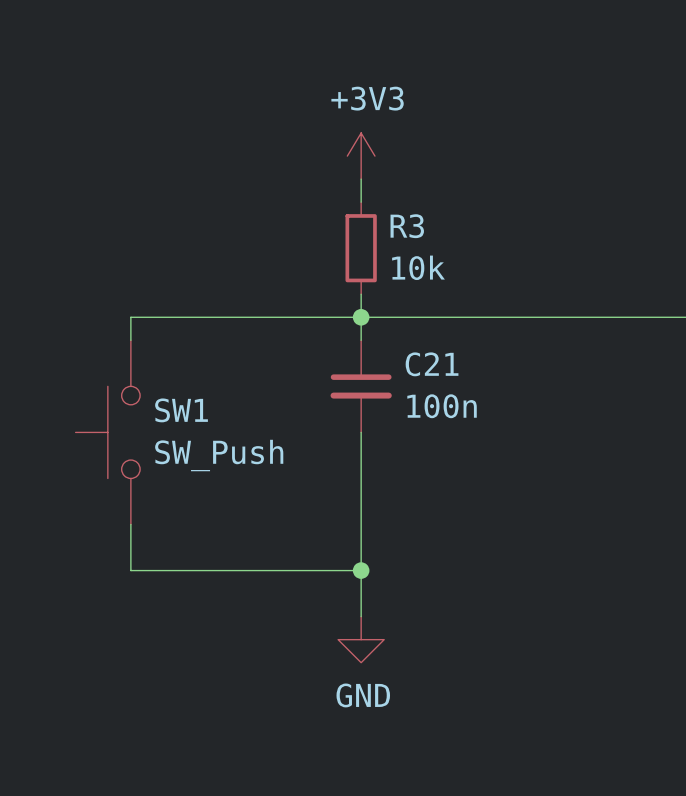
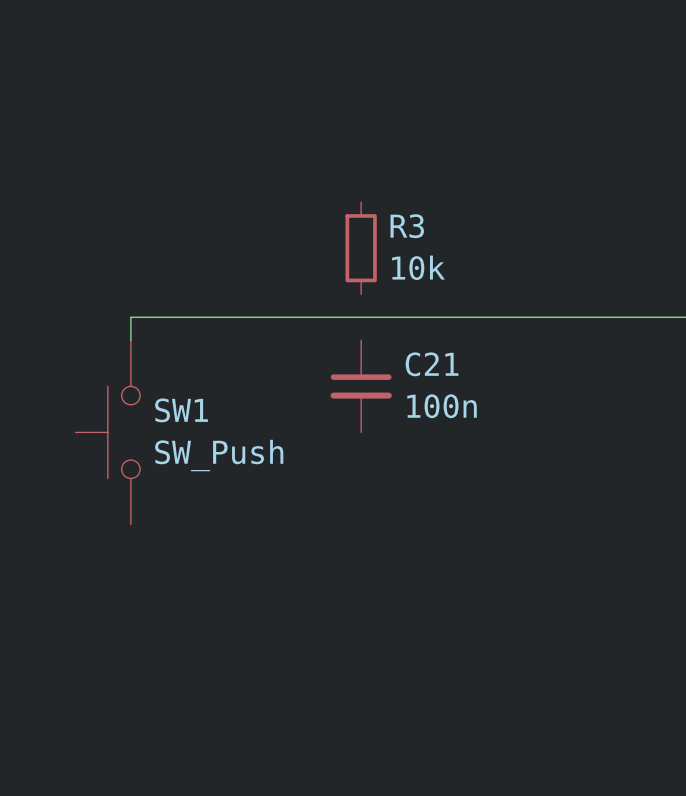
power symbol: +3V3 (361, 156) -> none
wire: (361, 179) (361, 202) -> none
wire: (361, 294) (361, 340) -> none
junction: (361, 317) -> none
wire: (361, 432) (361, 616) -> none
wire: (130, 524) (130, 570) (361, 570) -> none
junction: (361, 570) -> none
power symbol: GND (361, 639) -> none

